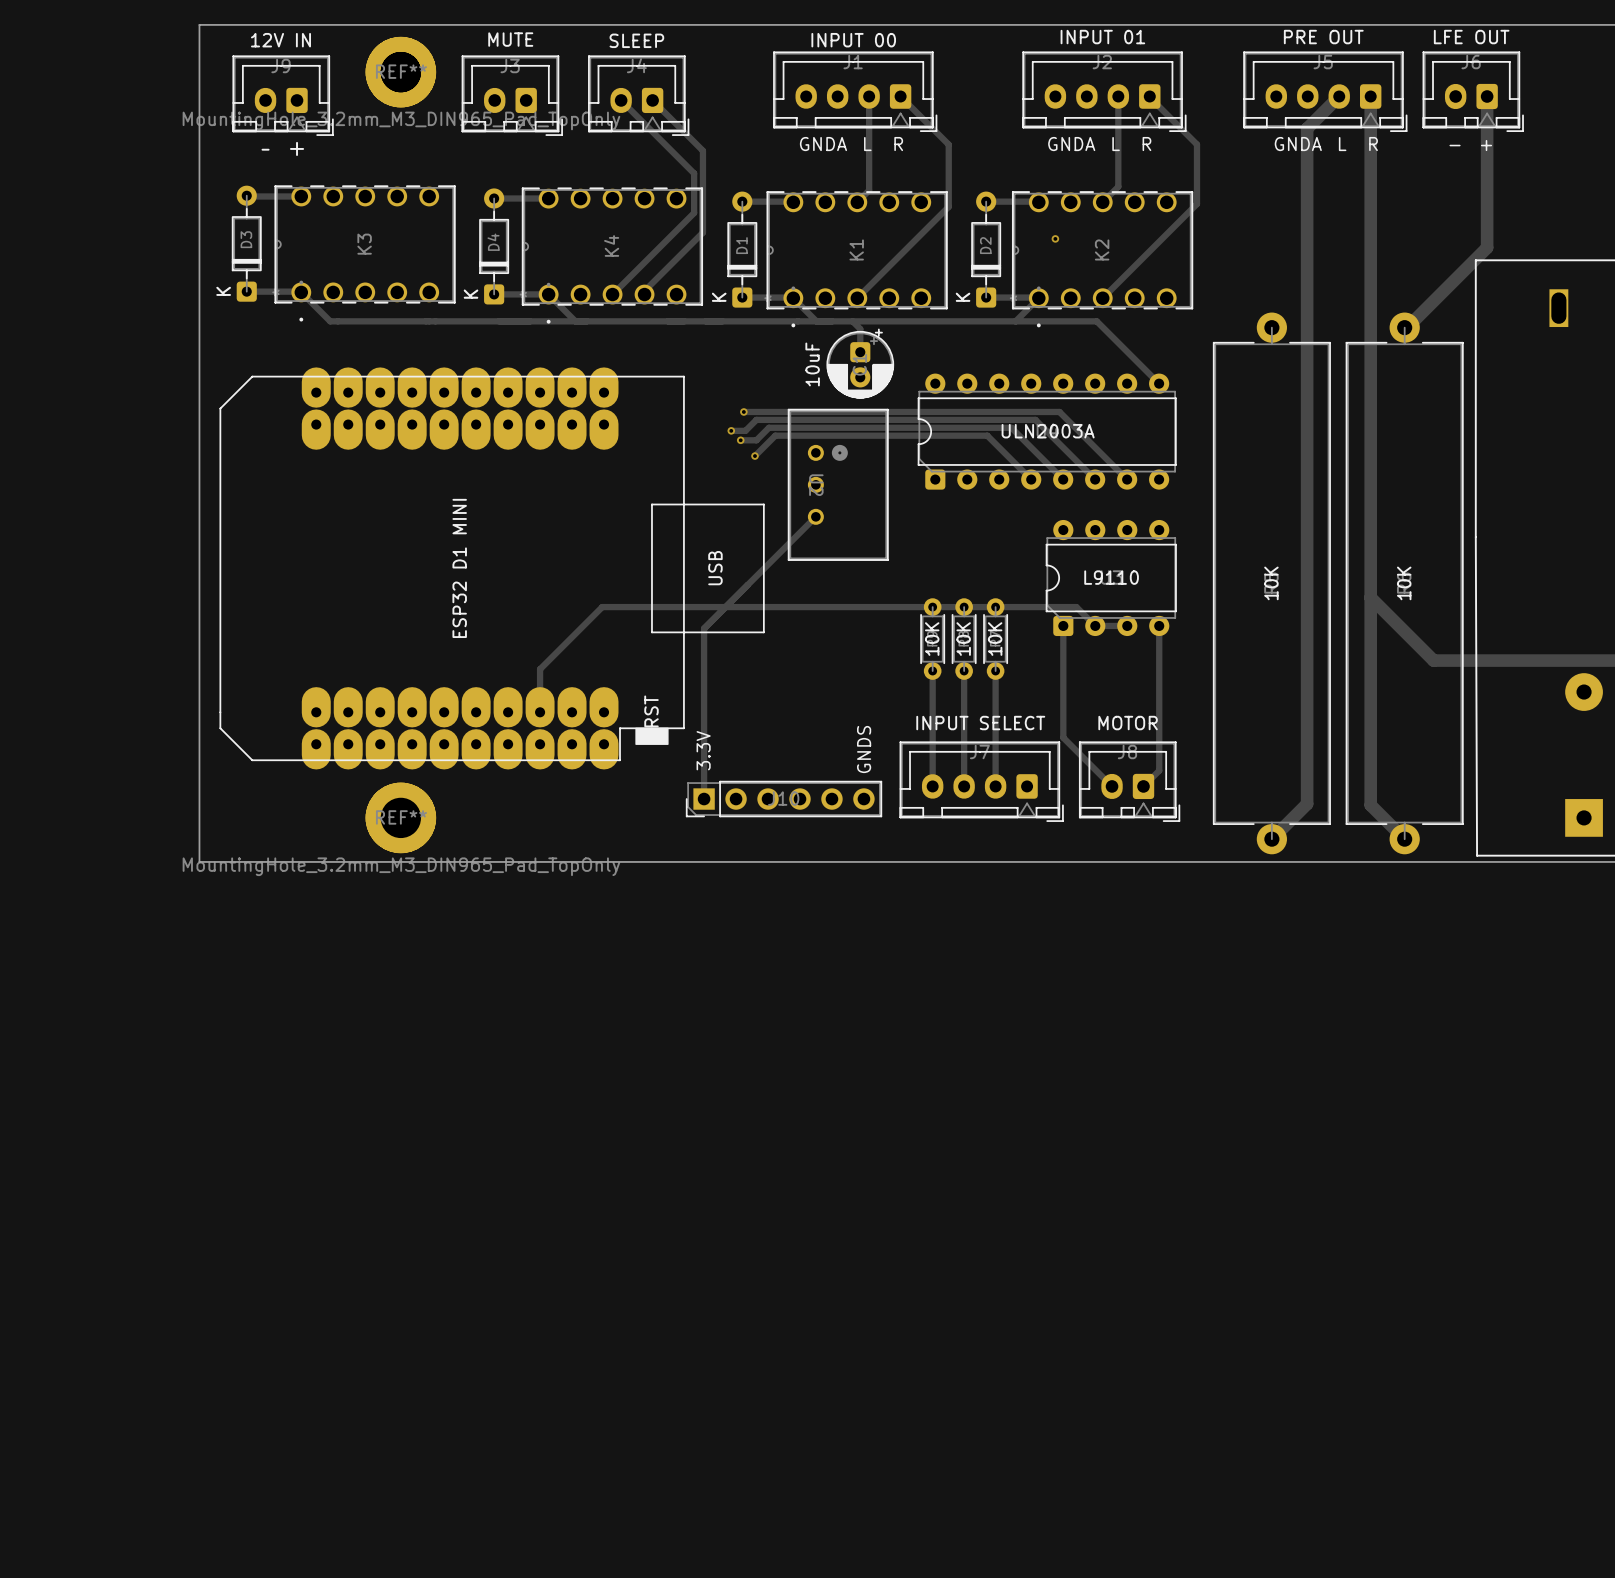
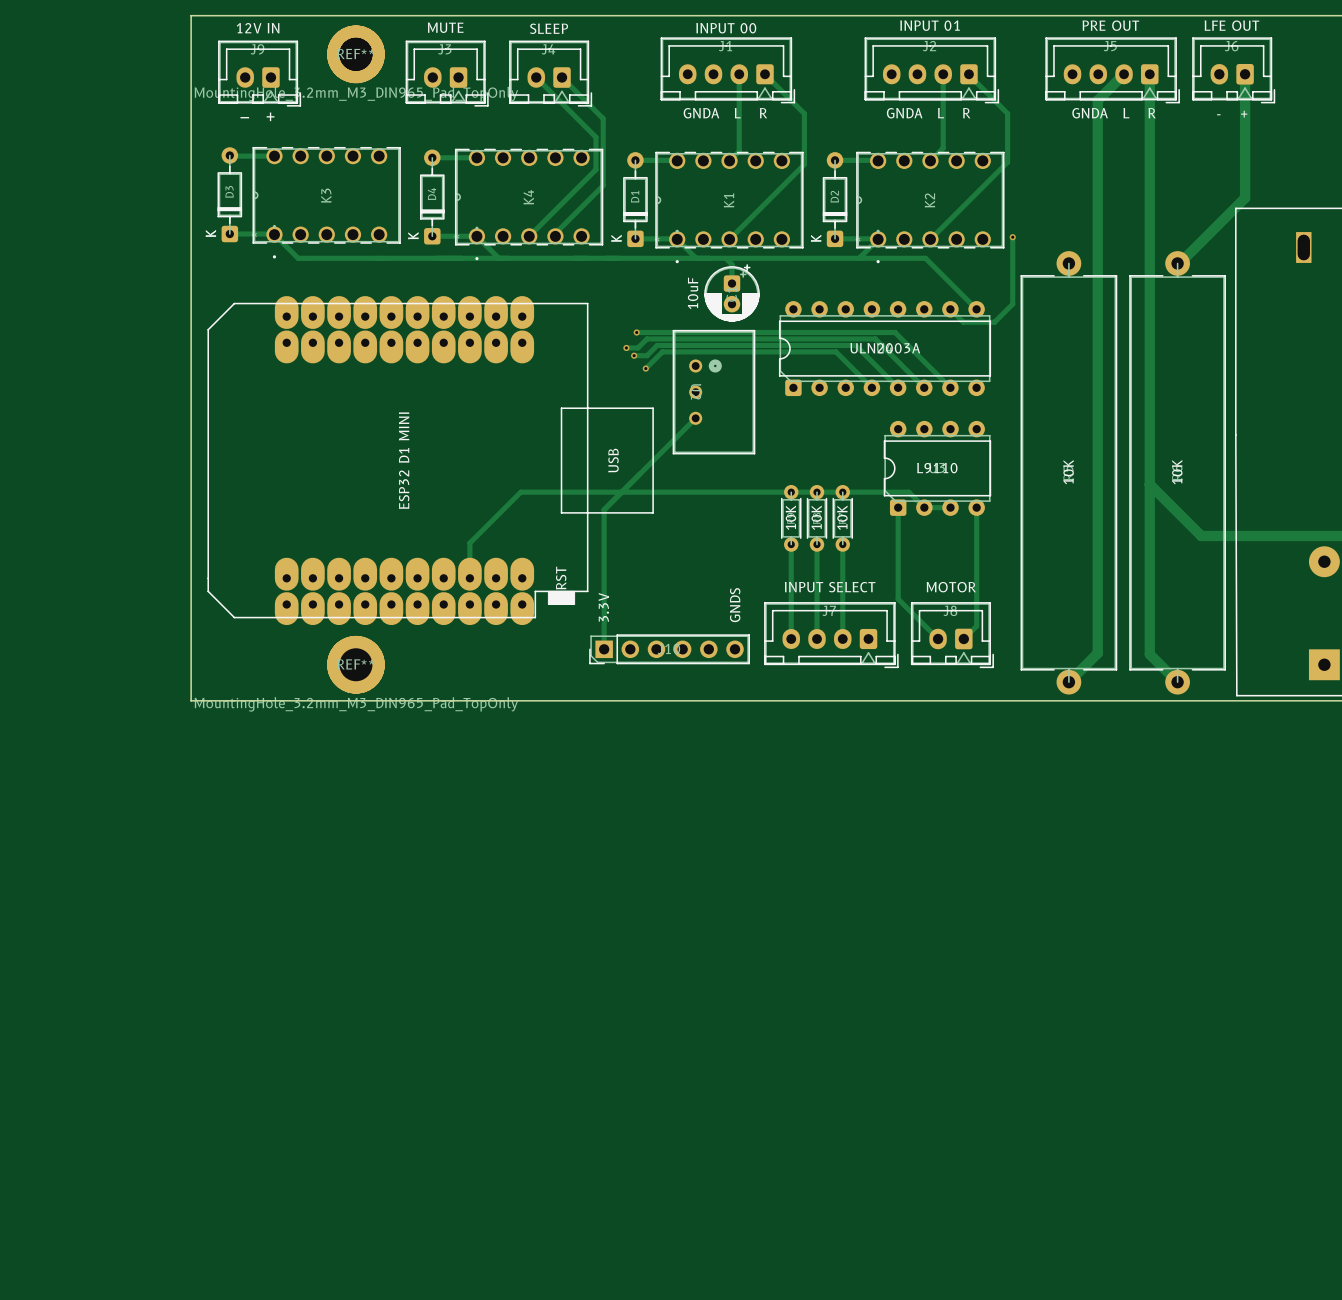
via: (1055, 238) -> none
track: none -> (1012, 237) (1012, 304) (994, 322) (963, 322) (950, 309)
via: none -> (1012, 237)

